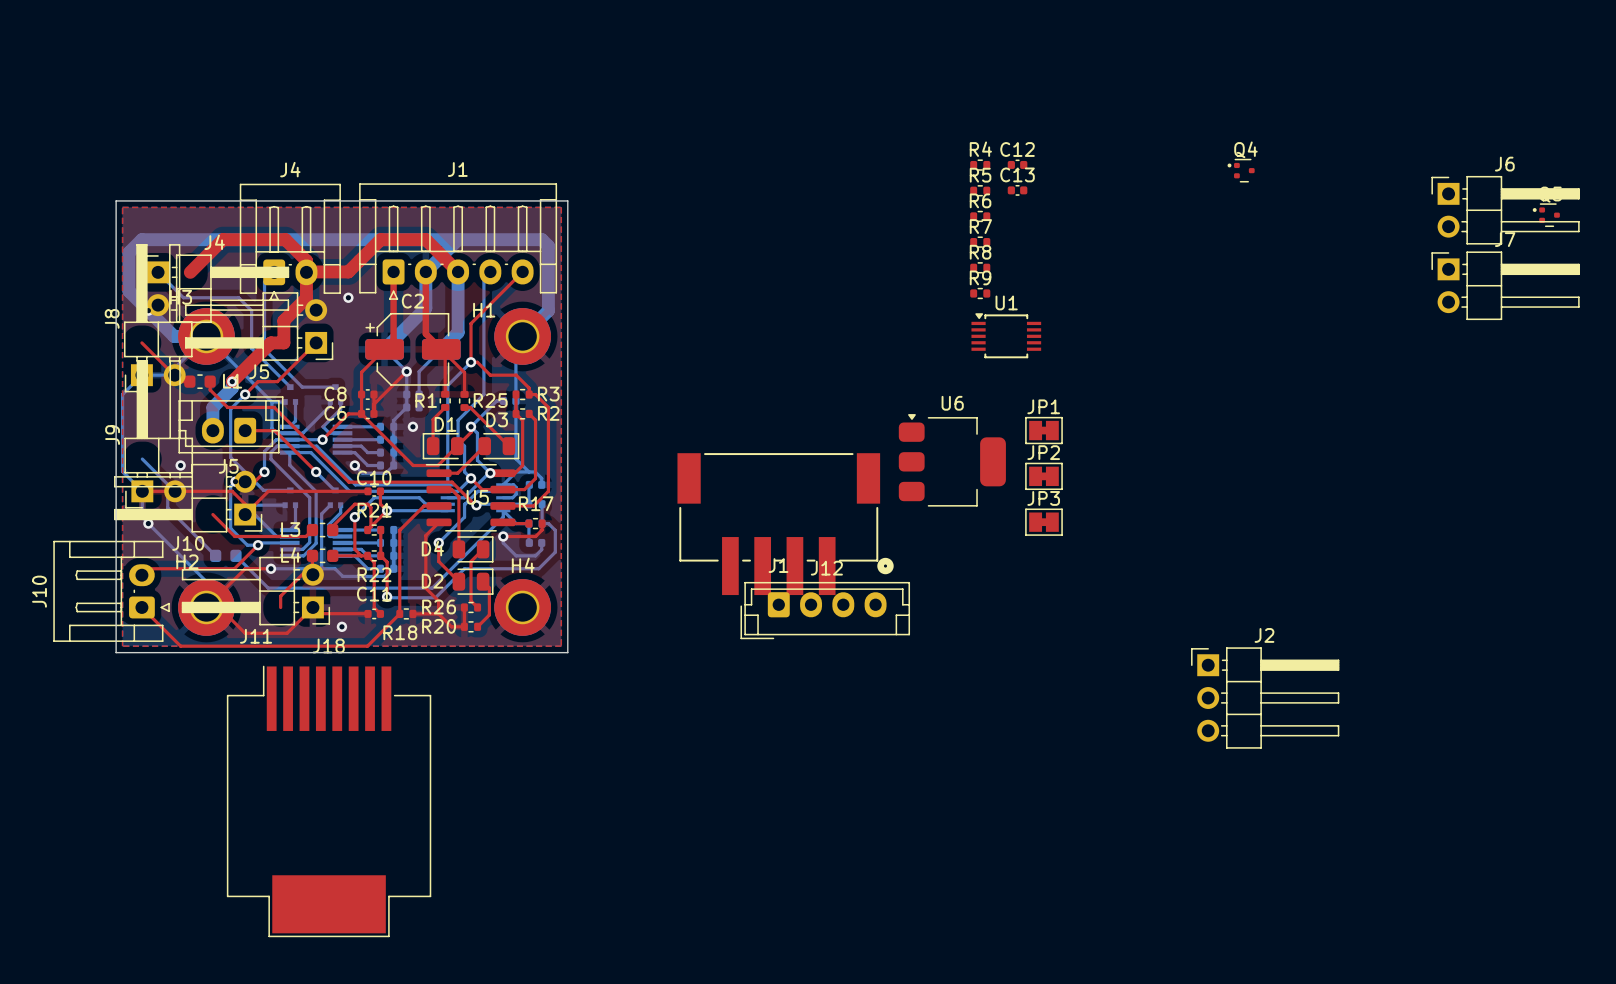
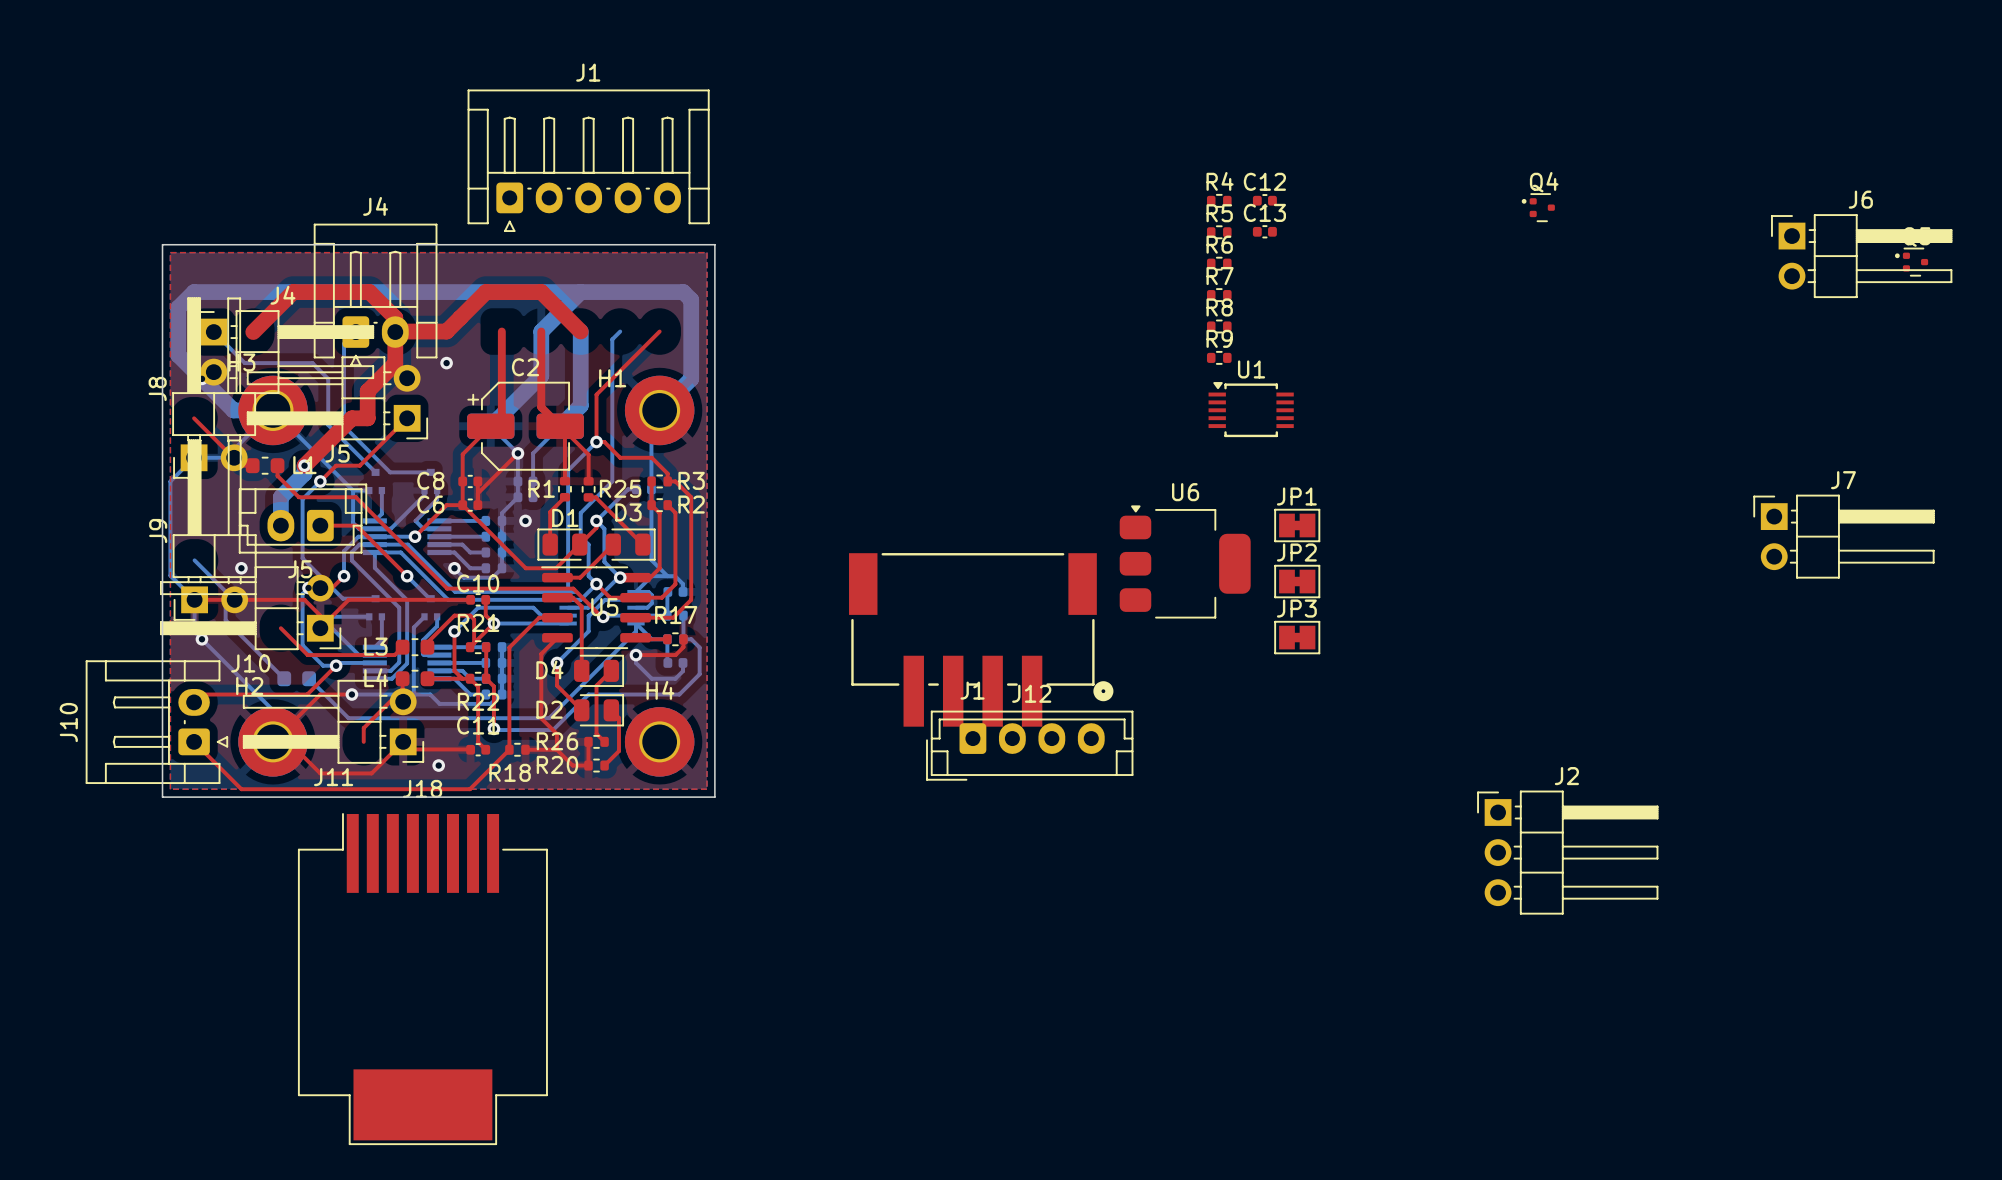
J1 position: (458, 241) -> (588, 160)
J7 position: (1505, 285) -> (1843, 536)

